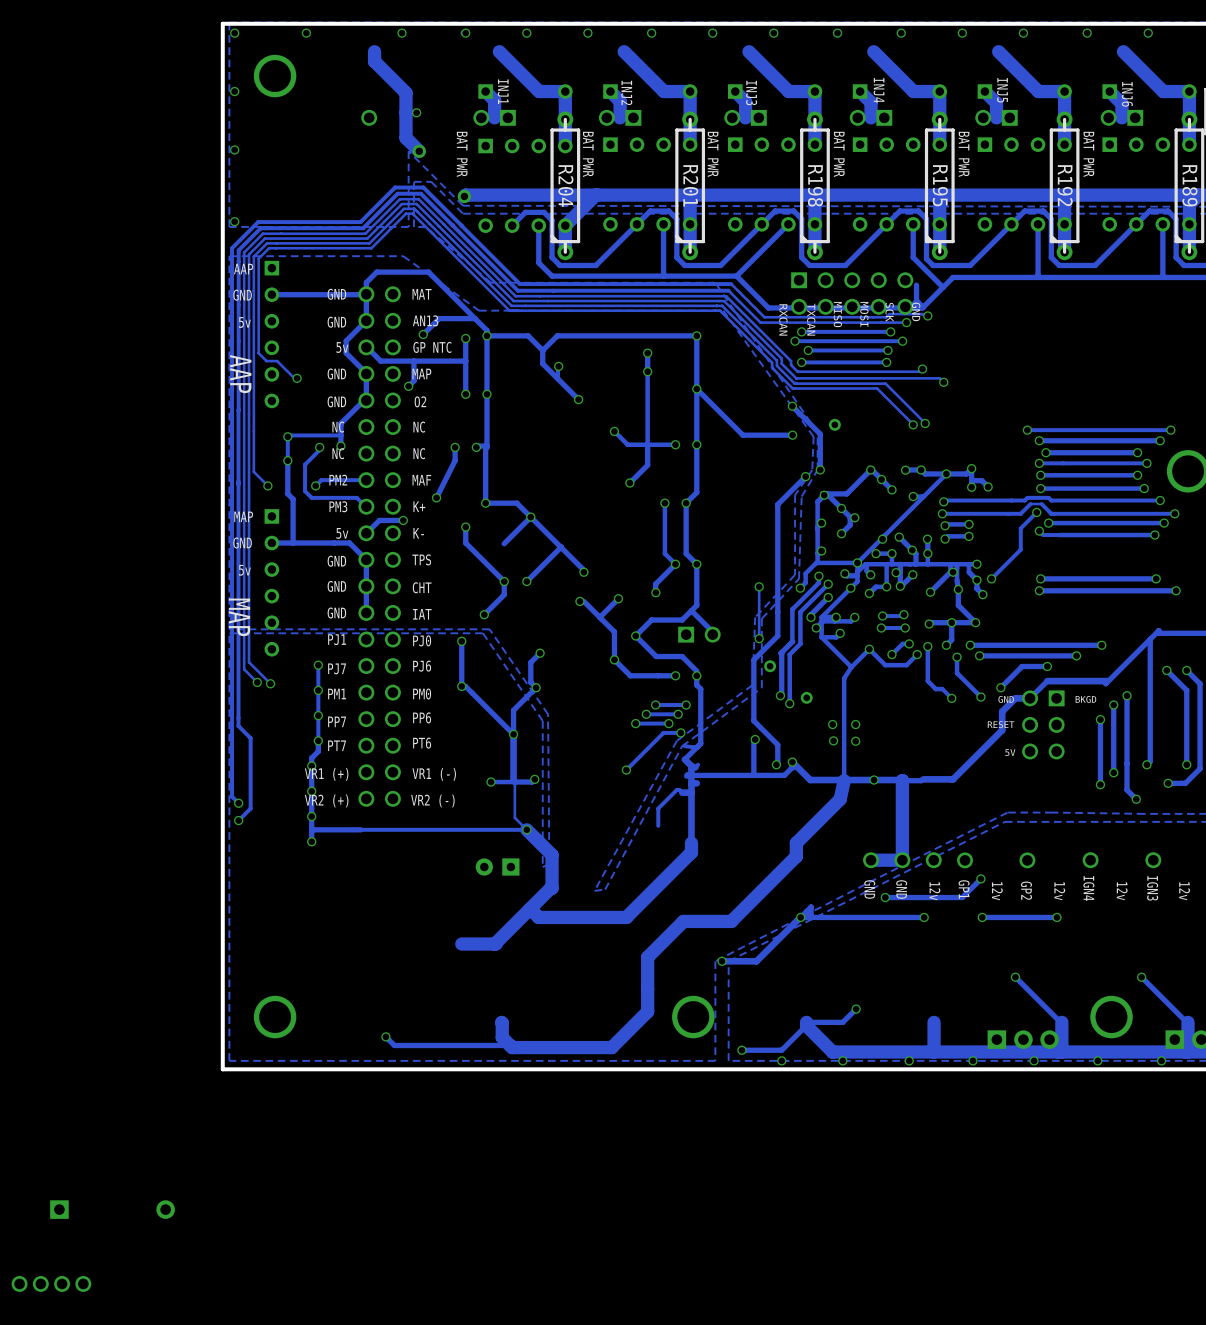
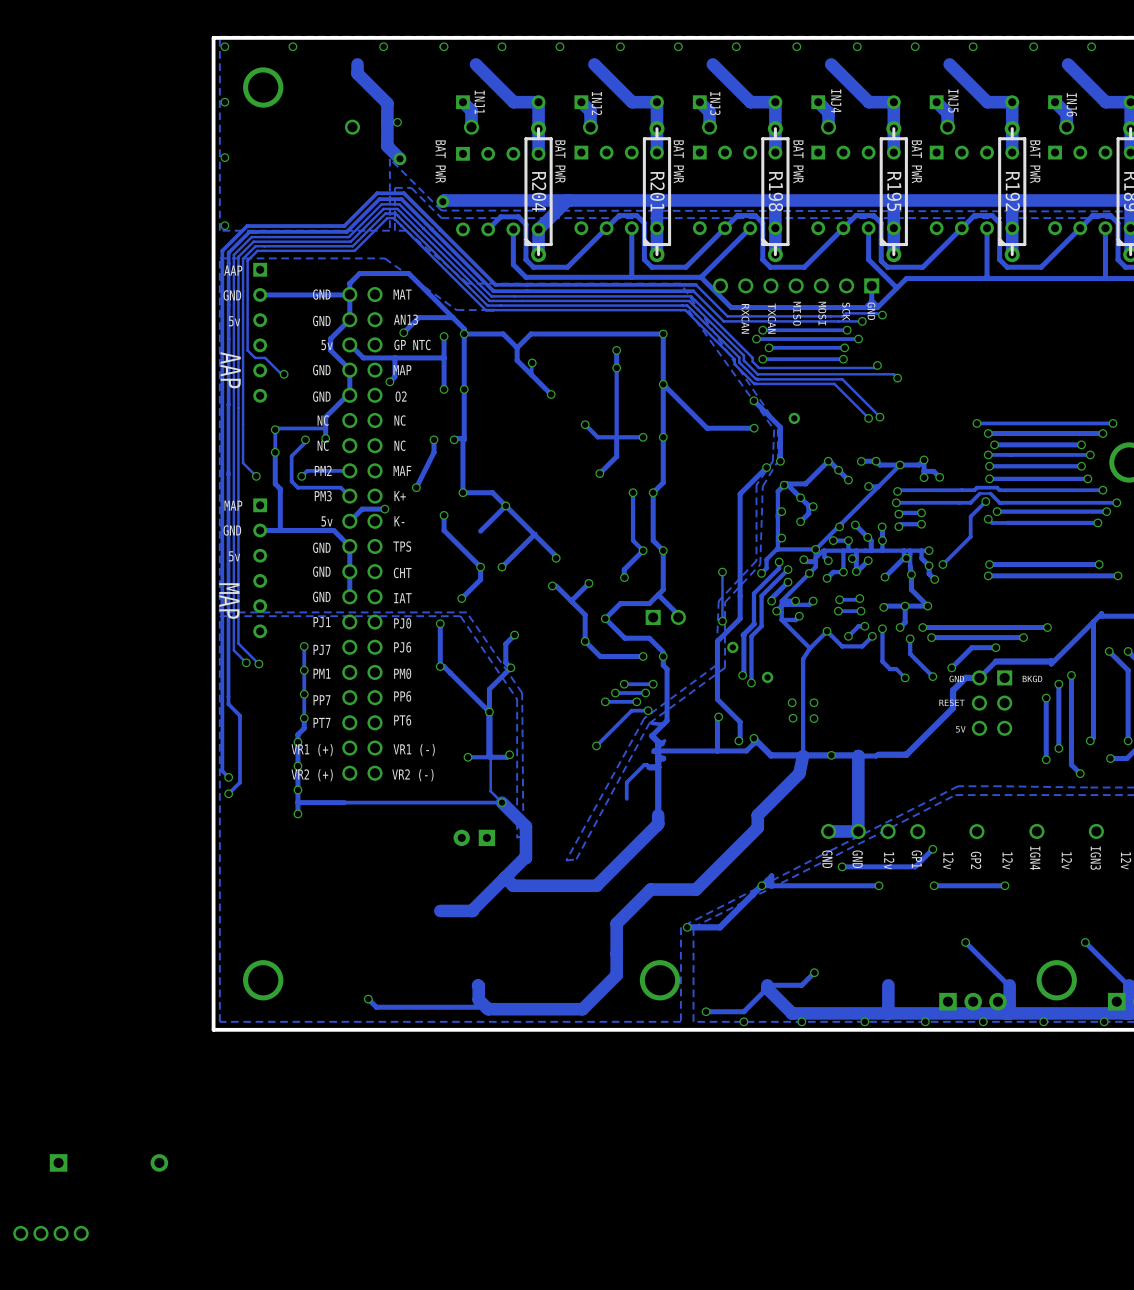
part footprint: [473, 109, 516, 126] -> [463, 119, 480, 135]
part footprint: [598, 109, 642, 126] -> [582, 119, 599, 135]
part footprint: [724, 109, 767, 126] -> [702, 119, 718, 135]
part footprint: [849, 109, 893, 126] -> [821, 119, 837, 135]
part footprint: [975, 109, 1018, 126] -> [940, 119, 956, 135]
part footprint: [1100, 109, 1144, 126] -> [1059, 119, 1075, 135]
part: none -> (796, 285)
part: (852, 293) -> none

